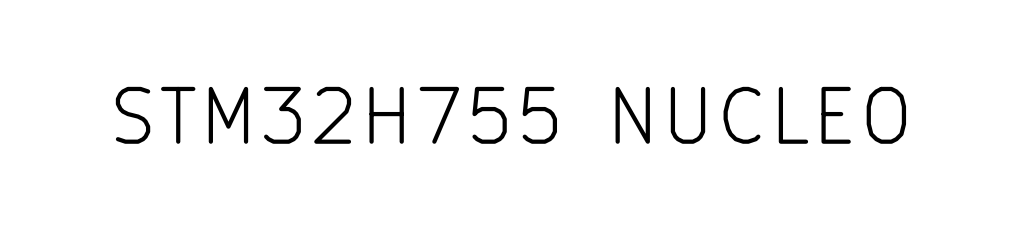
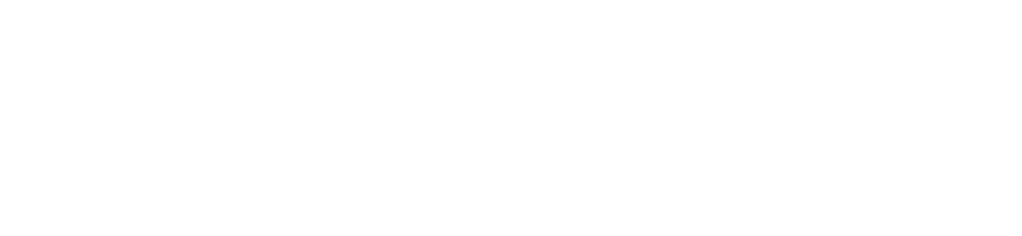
text: STM32H755 NUCLEO (510, 115) -> none

